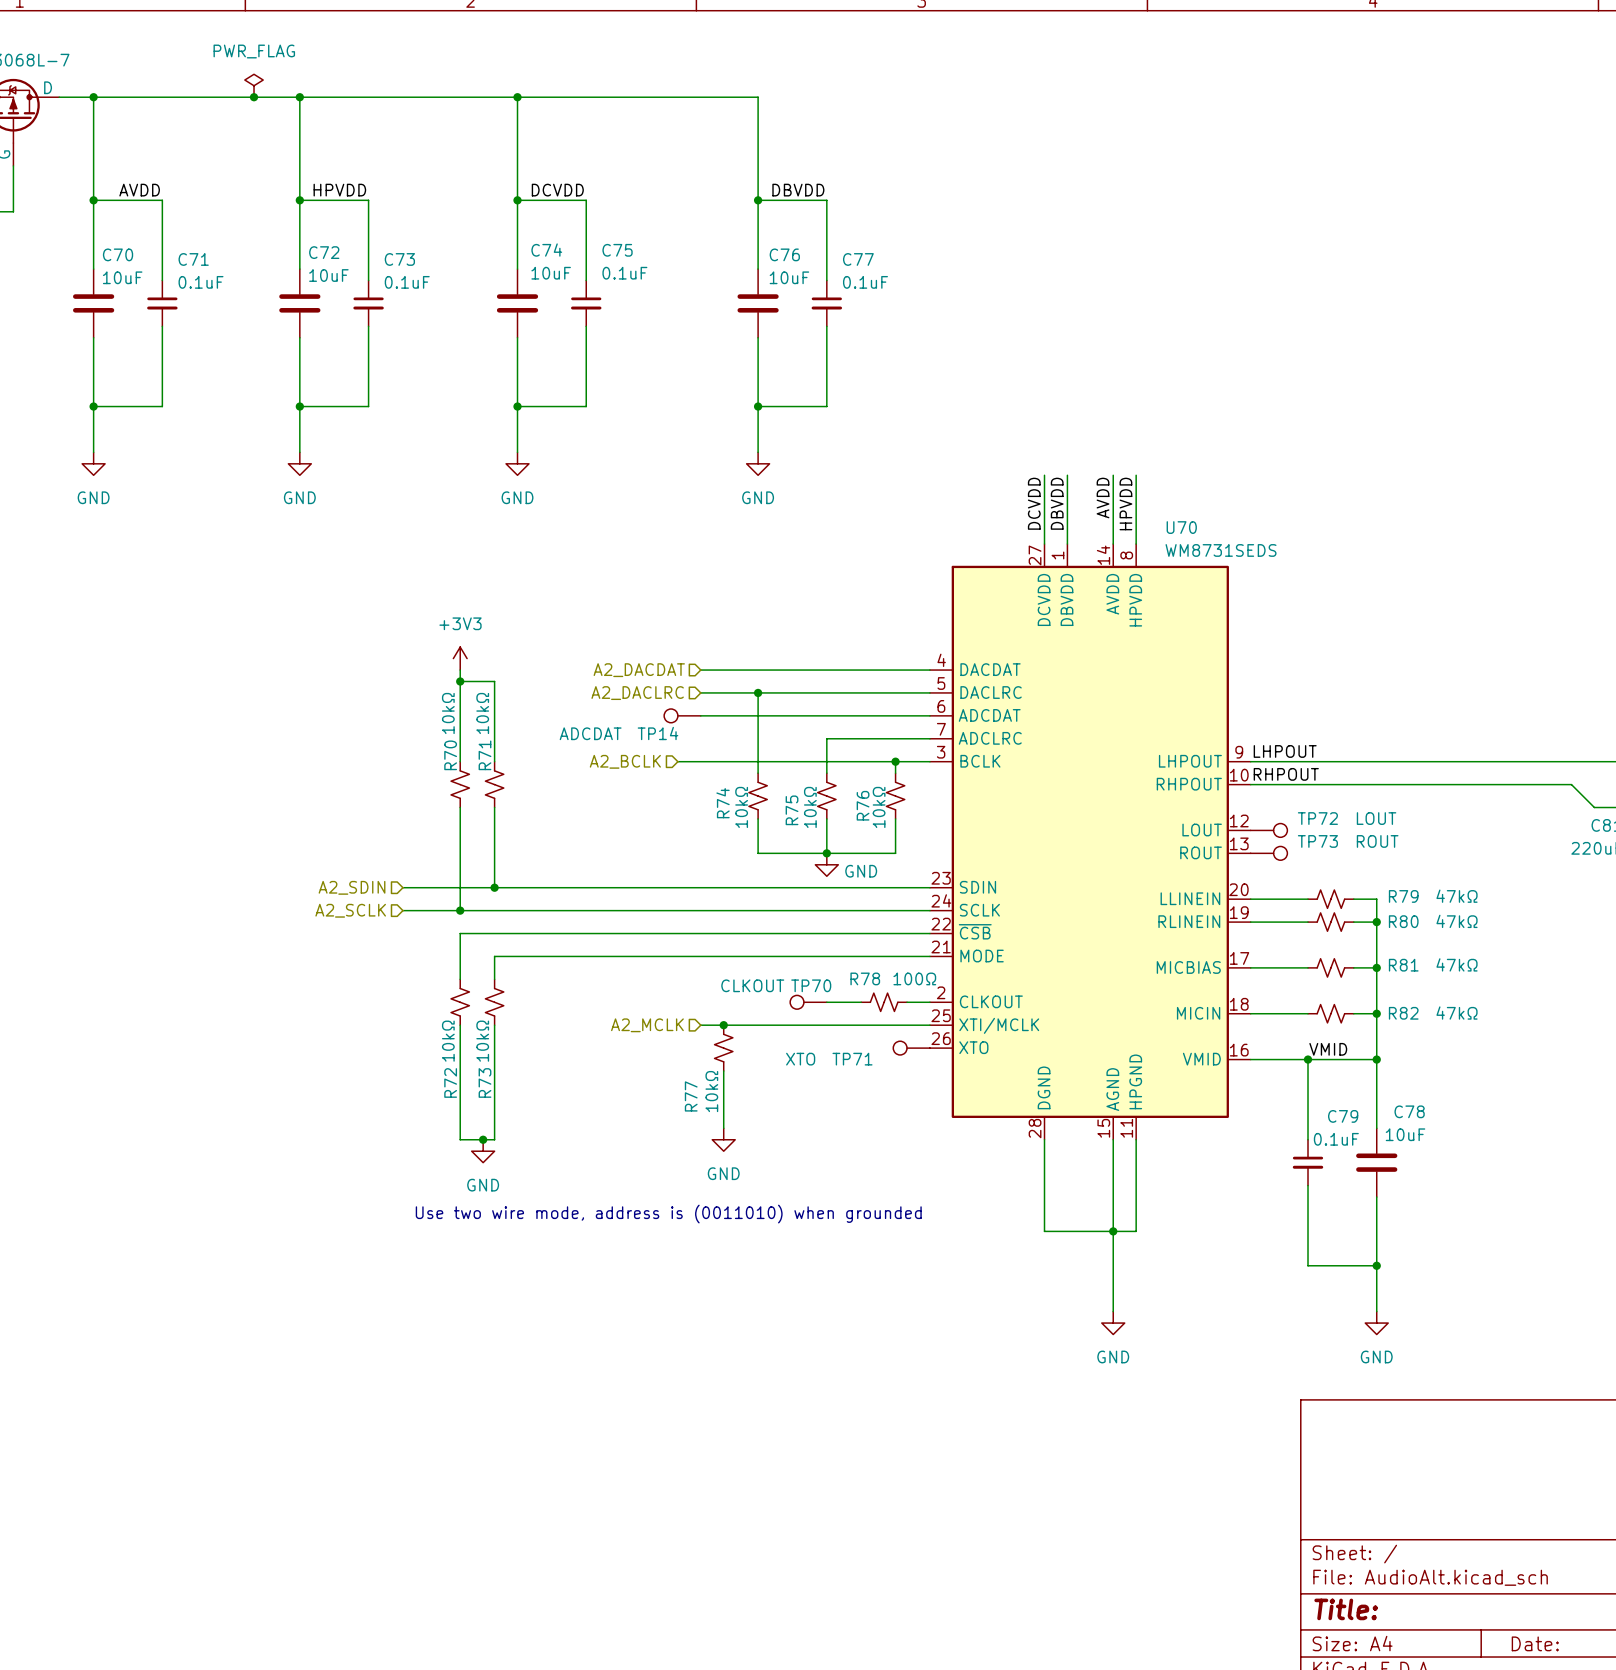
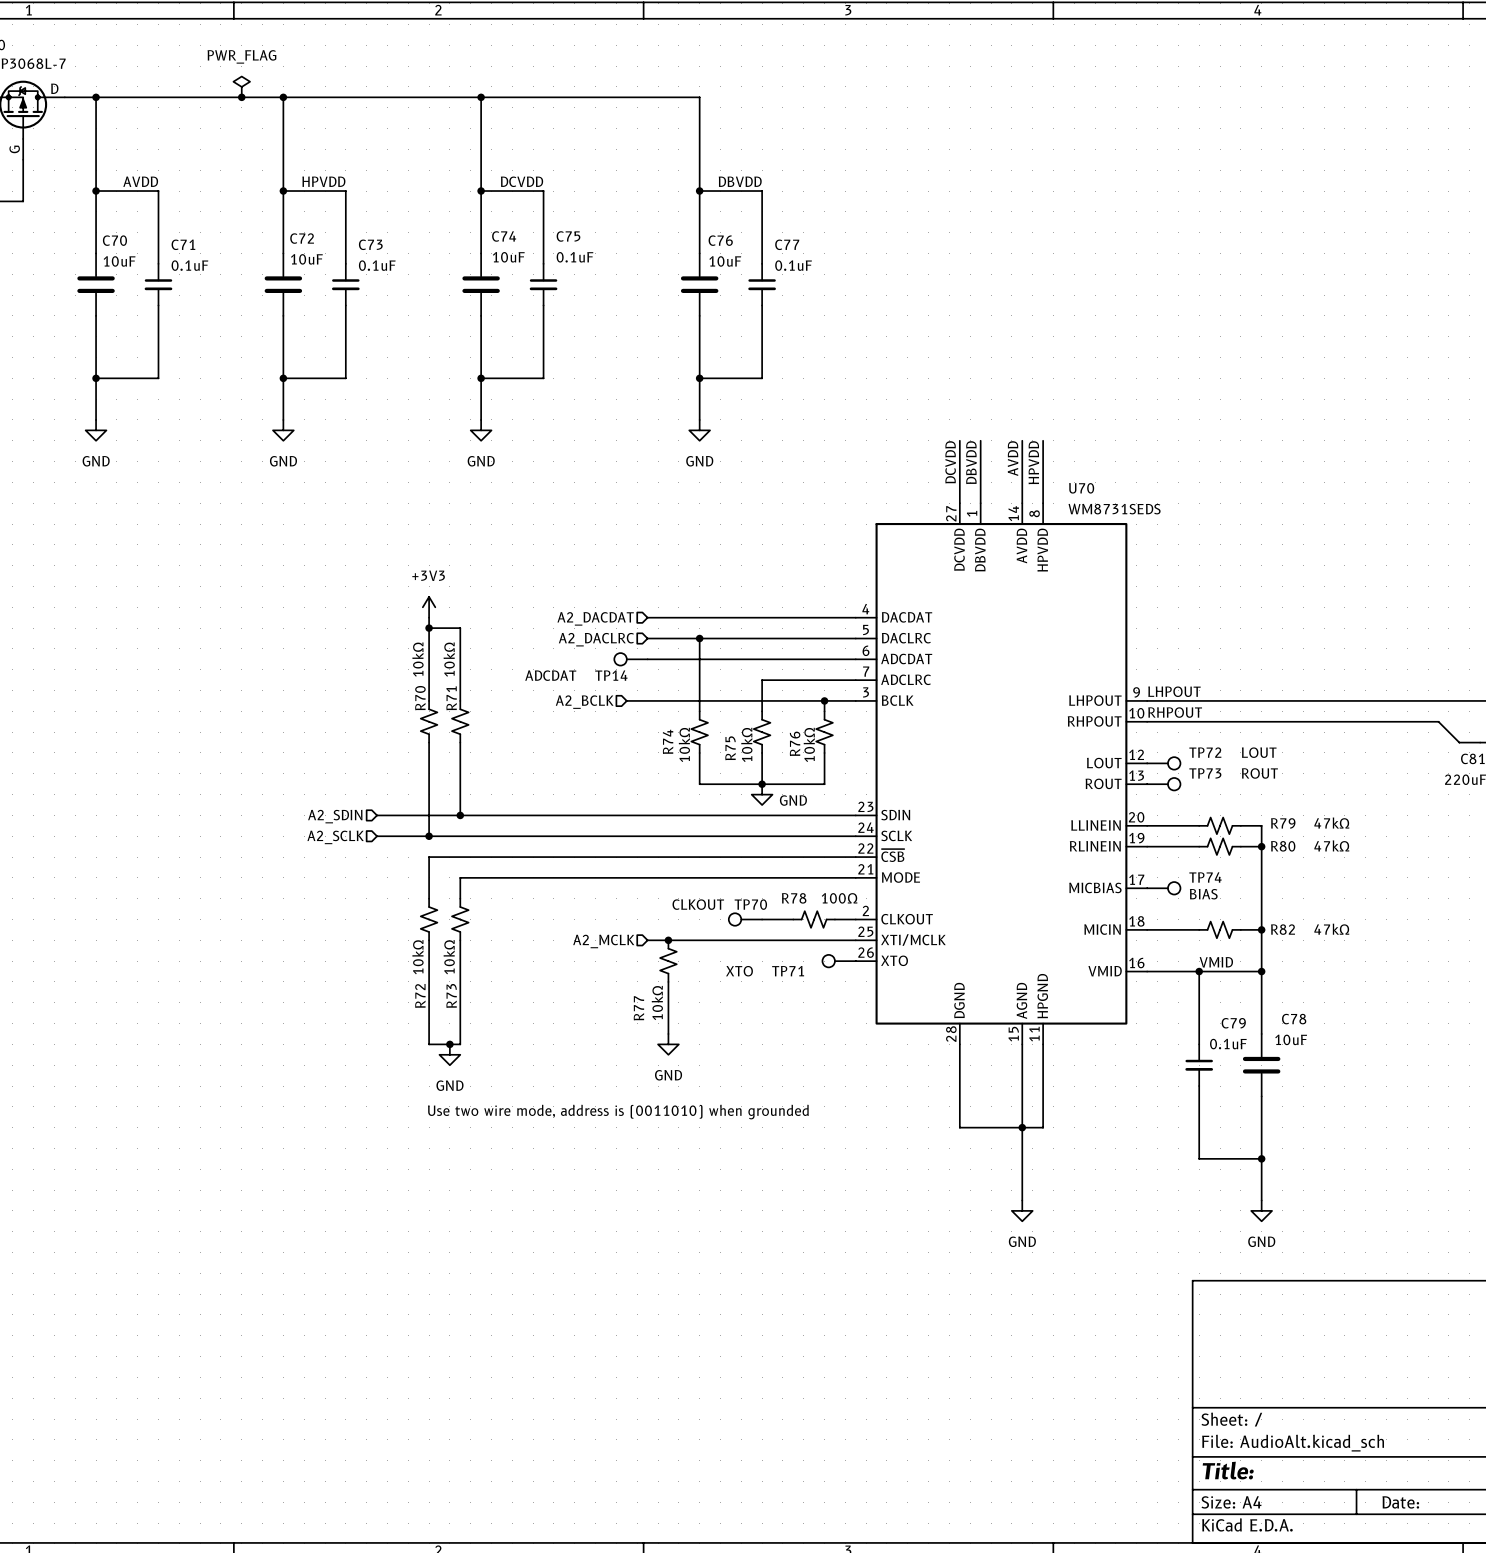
wire: (1250, 967) (1308, 967) -> none
TP74: none -> BIAS (1163, 888)
R81: 47kΩ (1330, 967) -> none
wire: (1353, 967) (1376, 967) -> none
junction: (1376, 967) -> none

